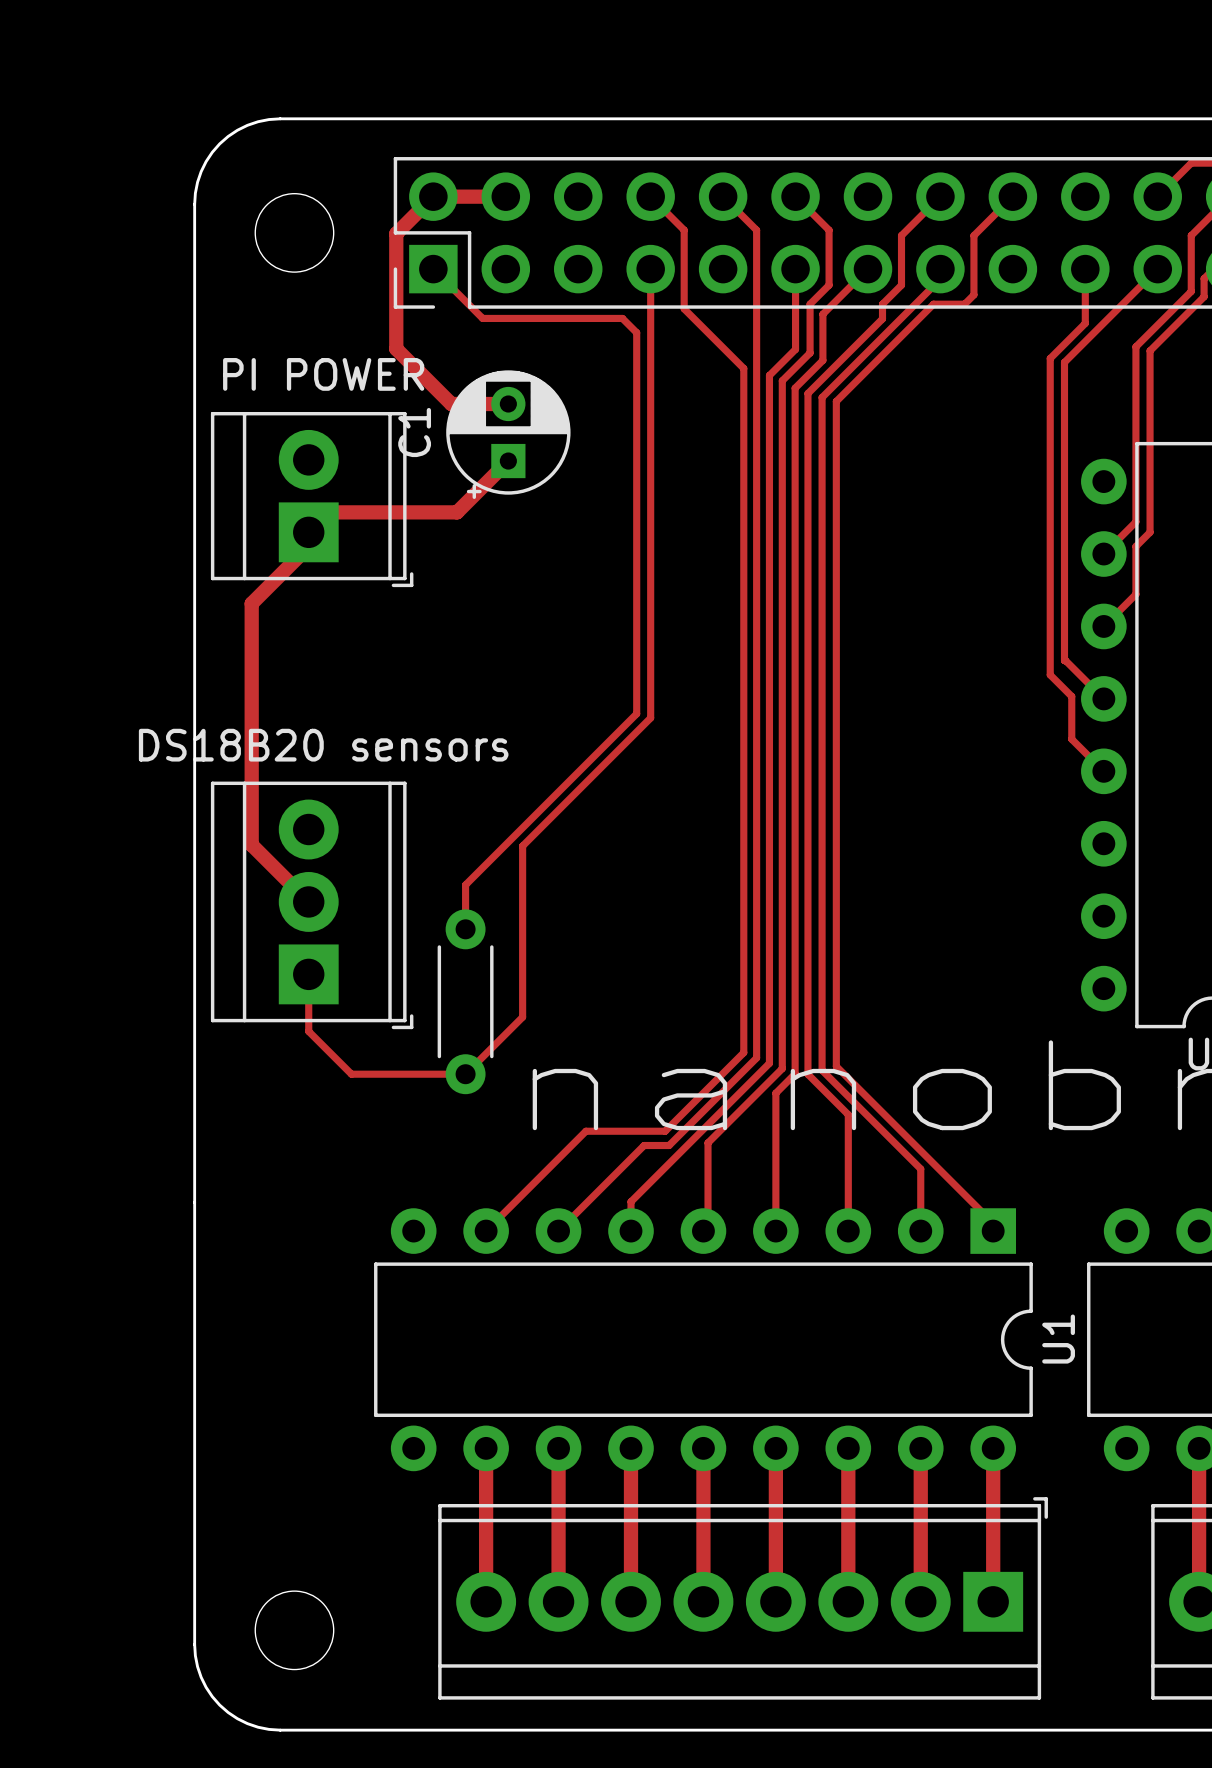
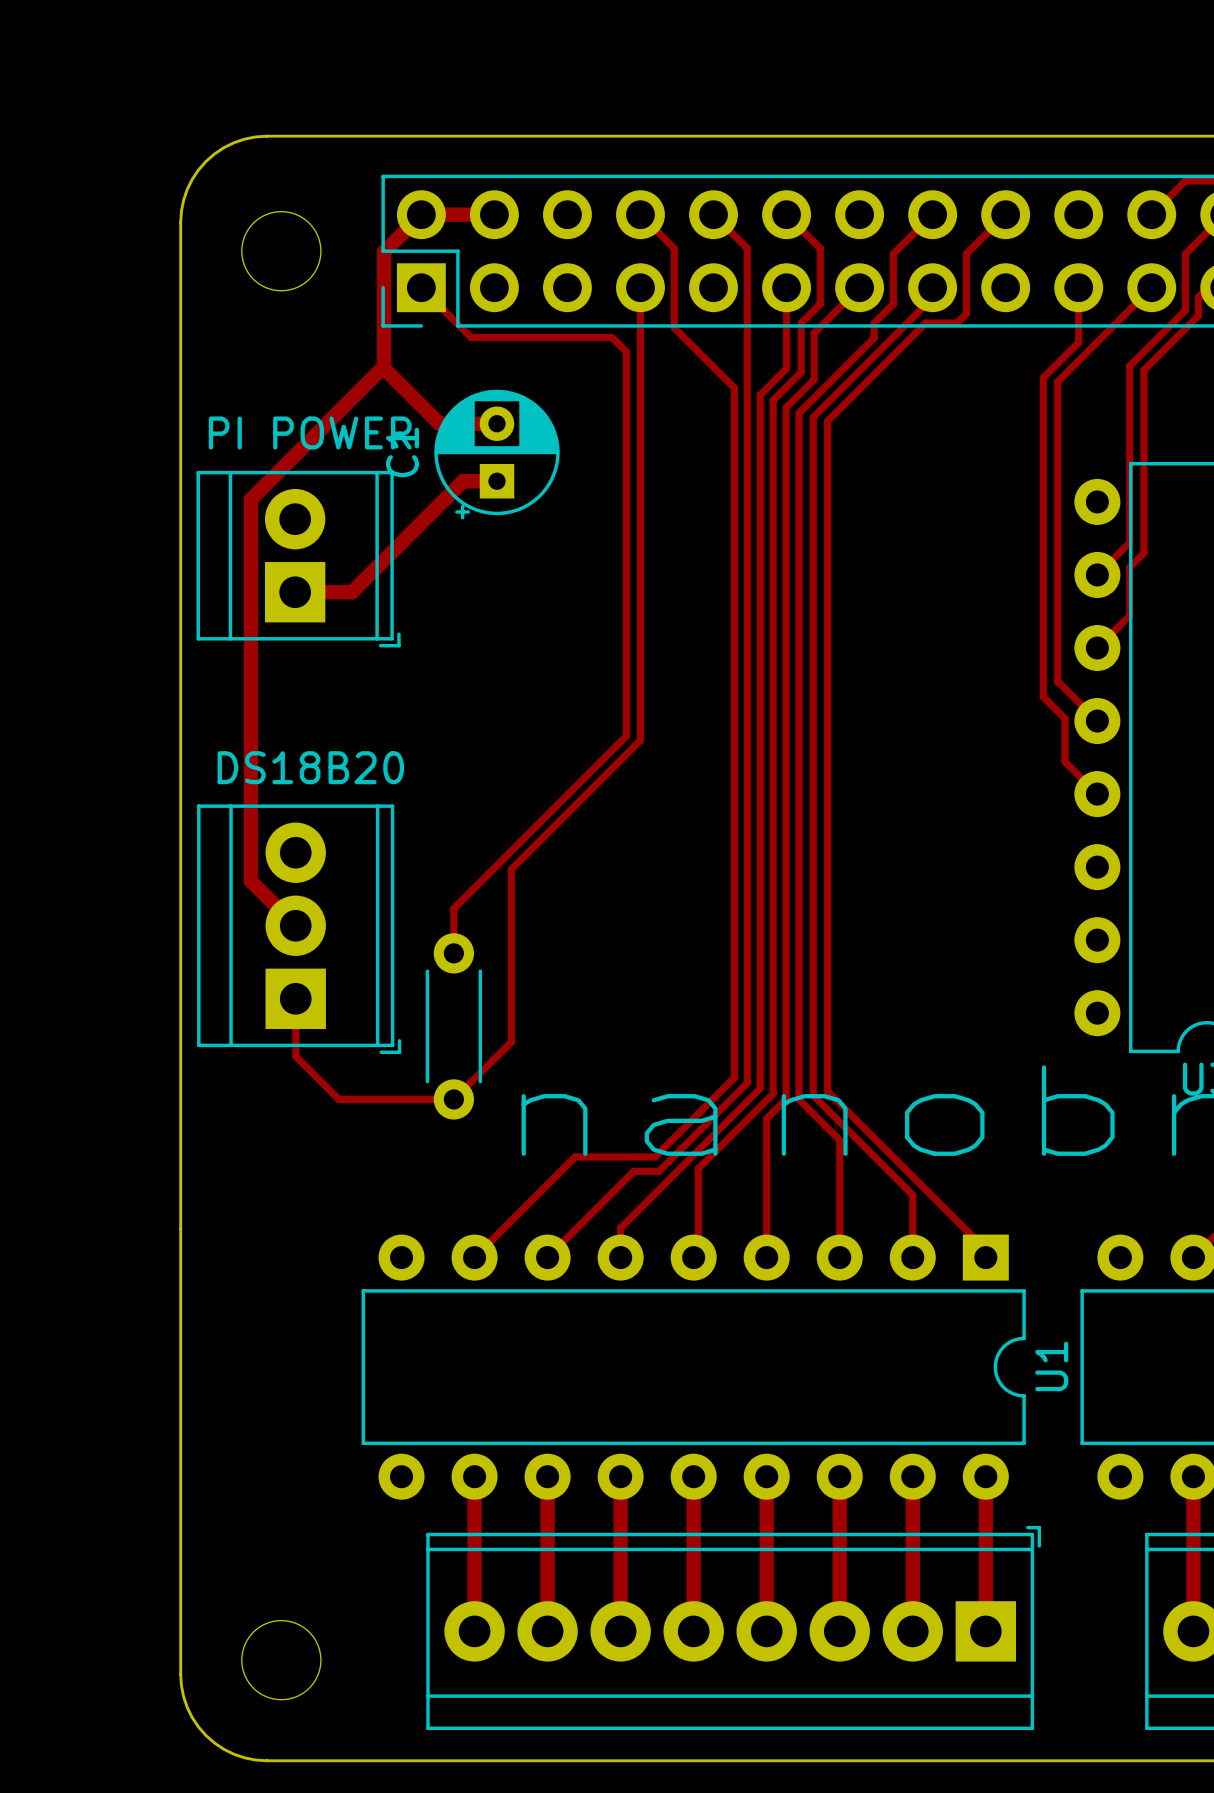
track: (508, 461) (457, 512) (300, 512) (296, 515) -> (497, 481) (463, 481) (352, 592) (295, 592)
part position: (312, 499) -> (298, 559)
track: (294, 532) (308, 532) (308, 546) (251, 603) (251, 844) (264, 857) -> (384, 368) (250, 499) (250, 880)
part value: DS18B20 sensors (323, 745) -> DS18B20 (310, 767)

